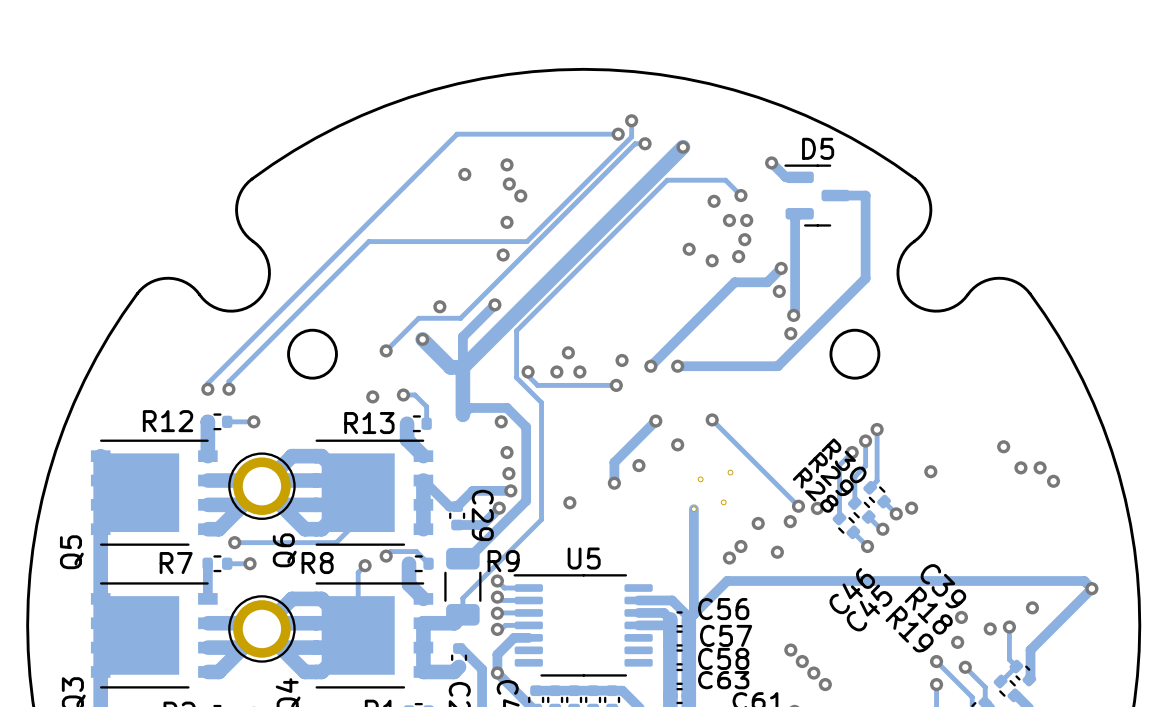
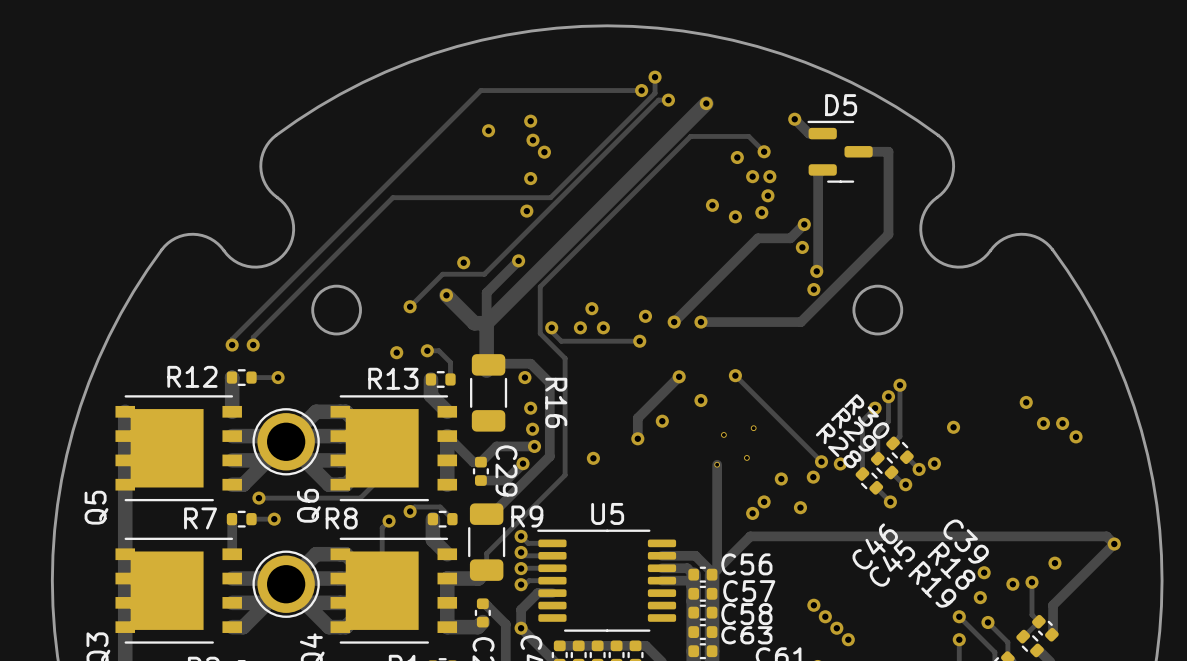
R16: none -> (488, 392)

